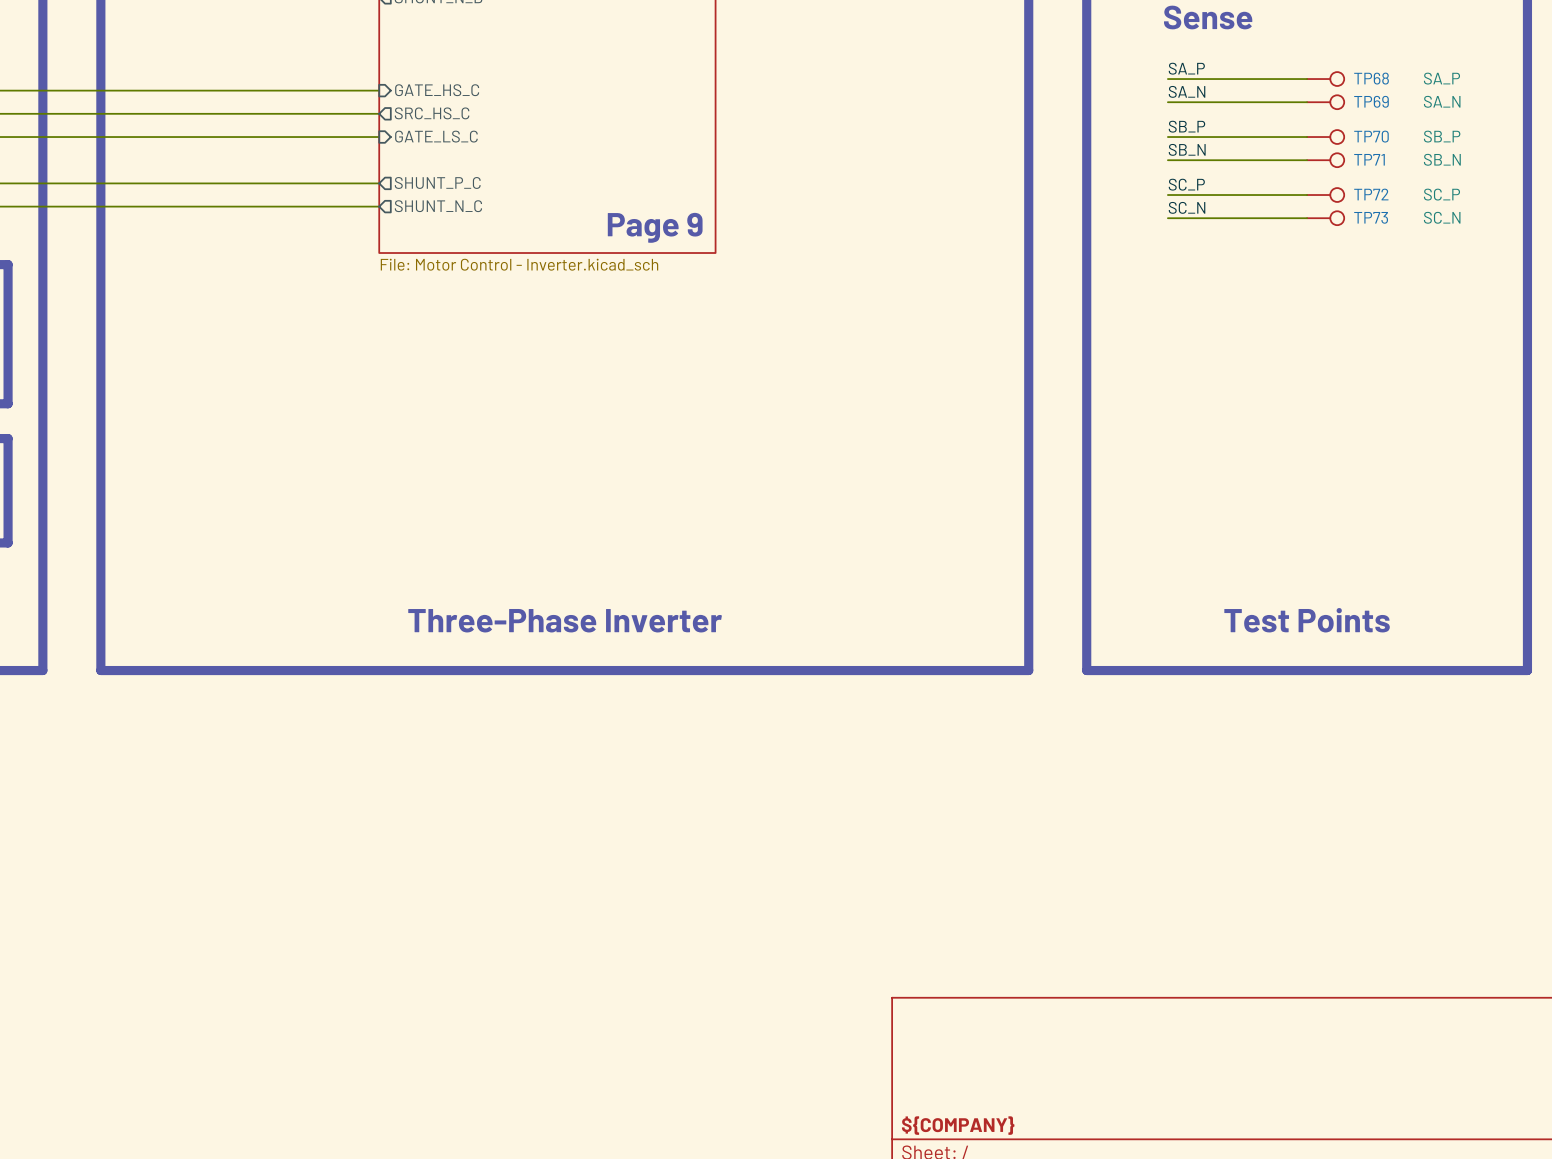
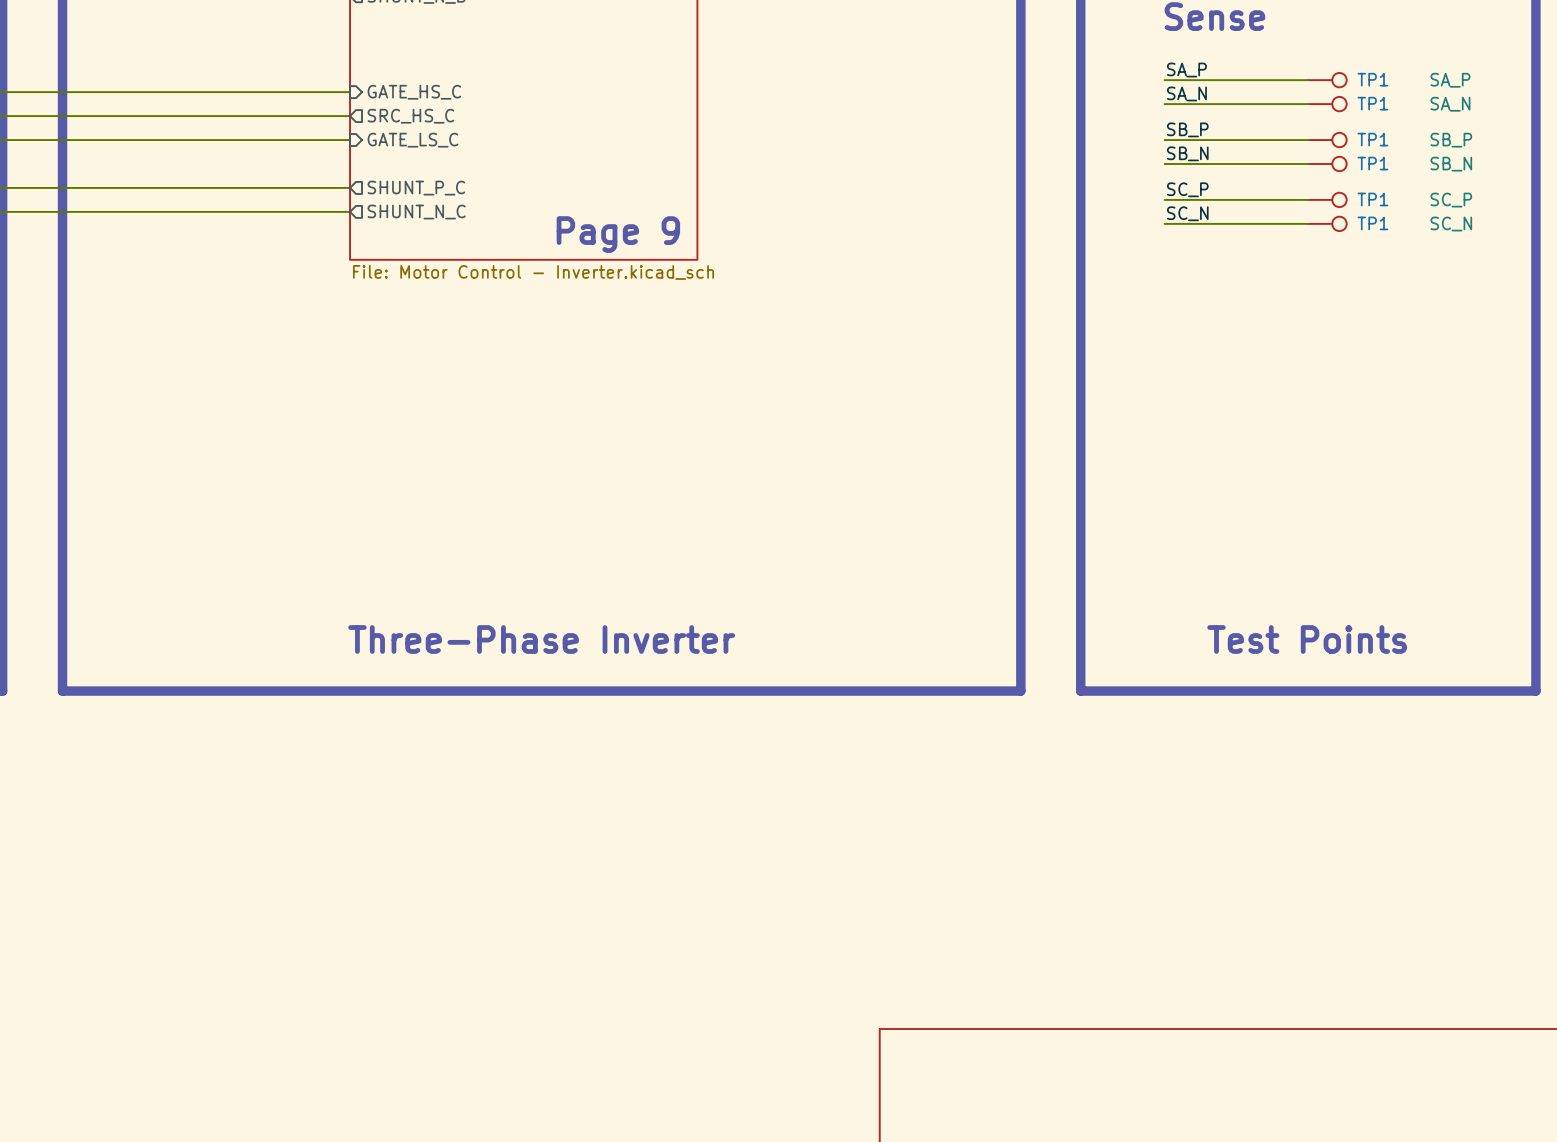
TP68 name: TP68 (1371, 78) -> TP1 (1372, 79)
TP69 name: TP69 (1371, 101) -> TP1 (1372, 103)
TP70 name: TP70 (1371, 136) -> TP1 (1372, 139)
TP71 name: TP71 (1369, 159) -> TP1 (1372, 163)
TP72 name: TP72 (1371, 194) -> TP1 (1372, 199)
TP73 name: TP73 (1371, 217) -> TP1 (1372, 223)

